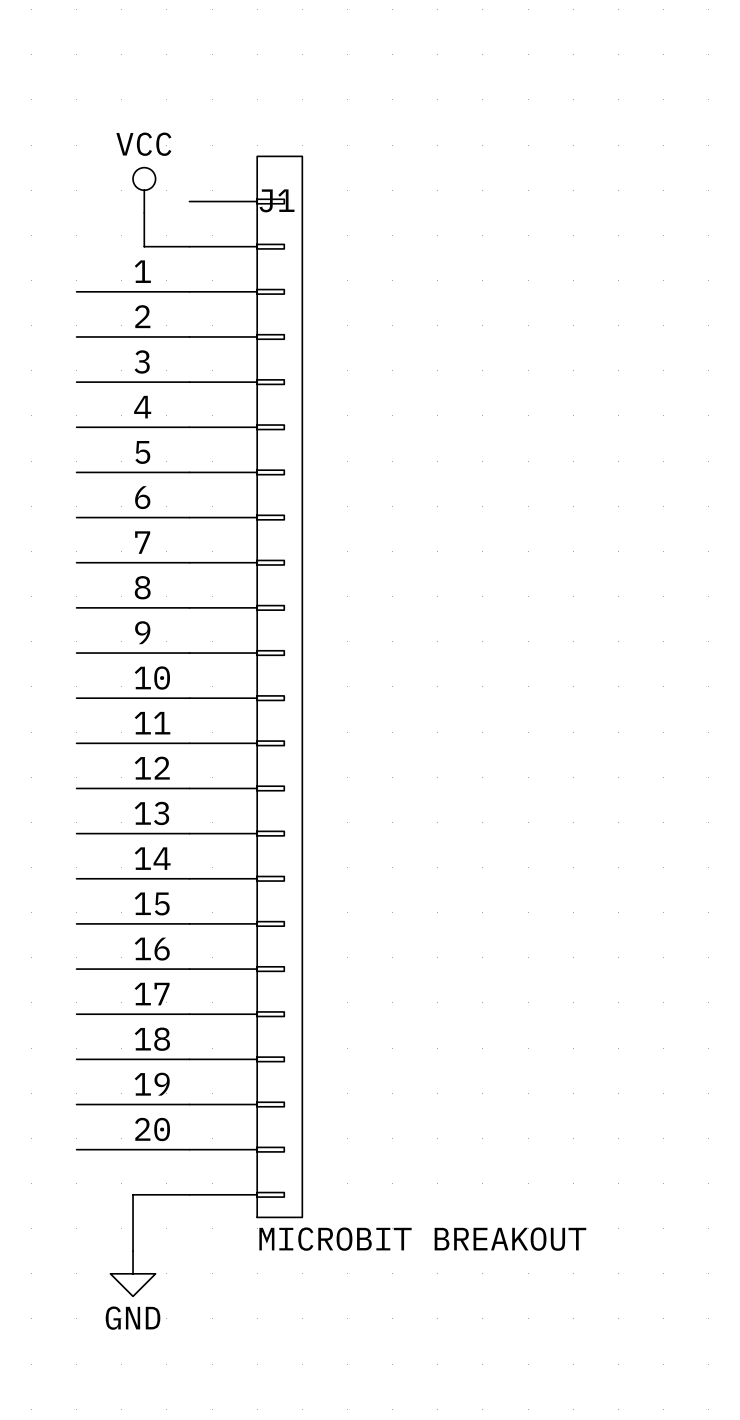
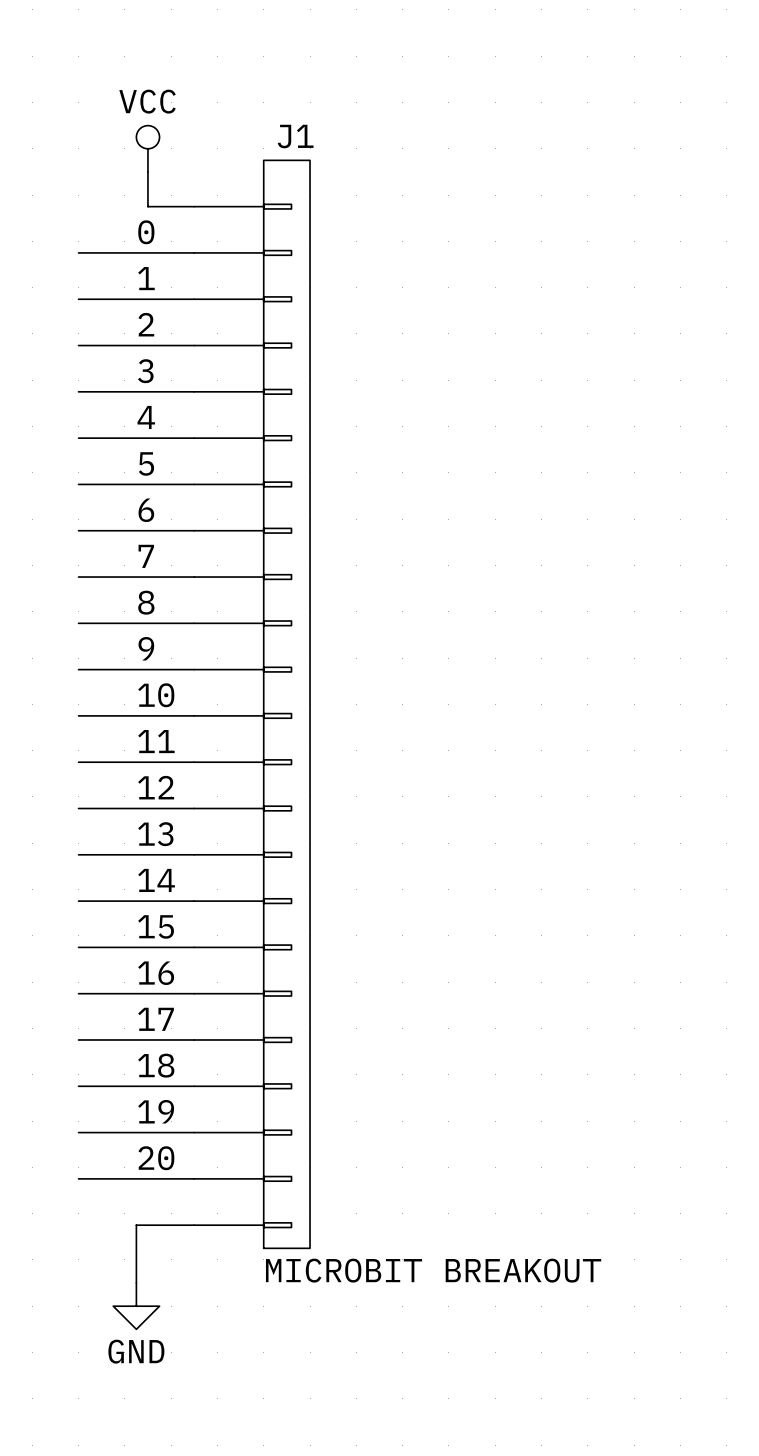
wire: none -> (147, 171) (147, 206) (194, 206)
power symbol position: VCC (144, 190) -> VCC (147, 148)
J1 name position: J1 (277, 200) -> J1 (295, 136)
wire: (144, 212) (144, 246) -> (78, 252) (147, 252)
label: none -> 0 (146, 232)

